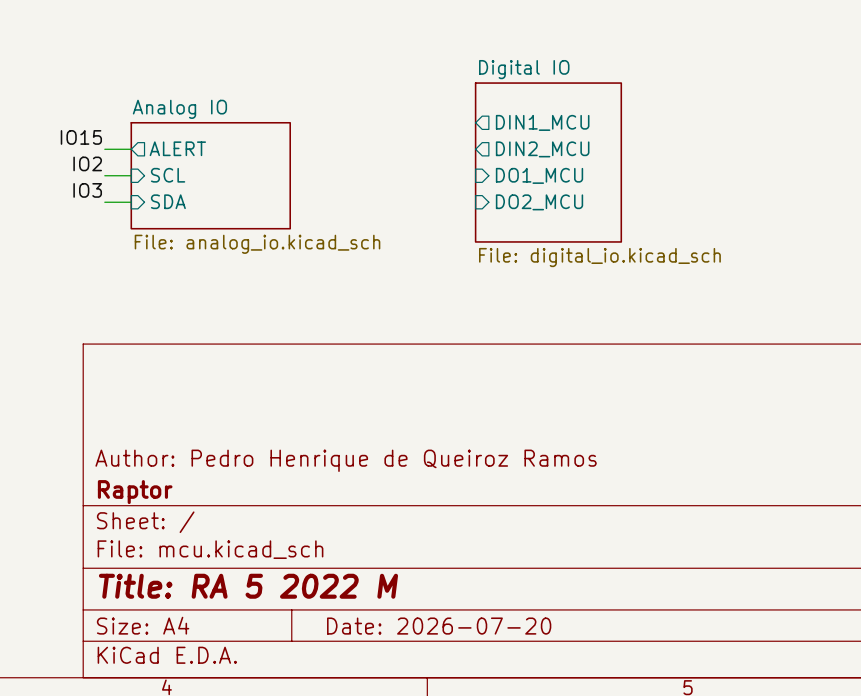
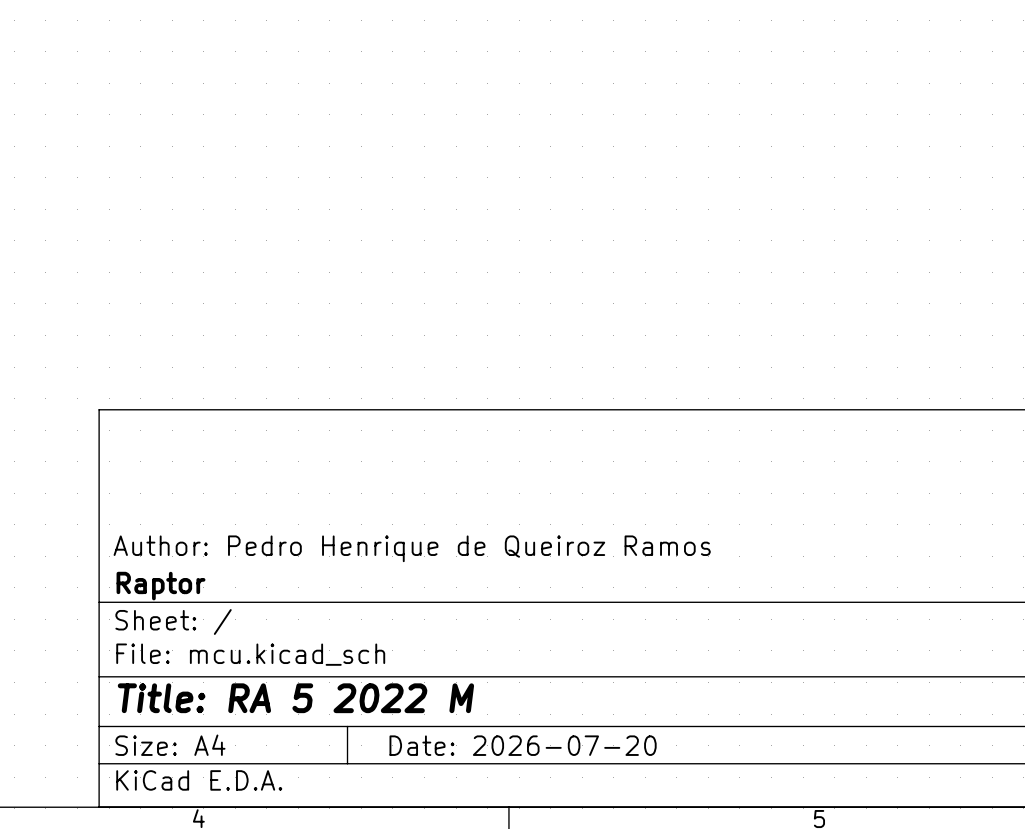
sheet pin: DIN1_MCU (542, 122) -> none
label: IO15 (81, 137) -> none
sheet pin: ALERT (177, 148) -> none
wire: (104, 149) (131, 149) -> none
sheet pin: DIN2_MCU (542, 149) -> none
sheet Digital IO: File: digital_io.kicad_sch (548, 162) -> none
label: IO2 (87, 163) -> none
wire: (104, 175) (131, 175) -> none
sheet pin: SCL (168, 175) -> none
sheet Analog IO: File: analog_io.kicad_sch (210, 175) -> none
sheet pin: DO1_MCU (539, 175) -> none
label: IO3 (87, 190) -> none
sheet pin: SDA (168, 201) -> none
wire: (104, 202) (131, 202) -> none
sheet pin: DO2_MCU (539, 202) -> none

